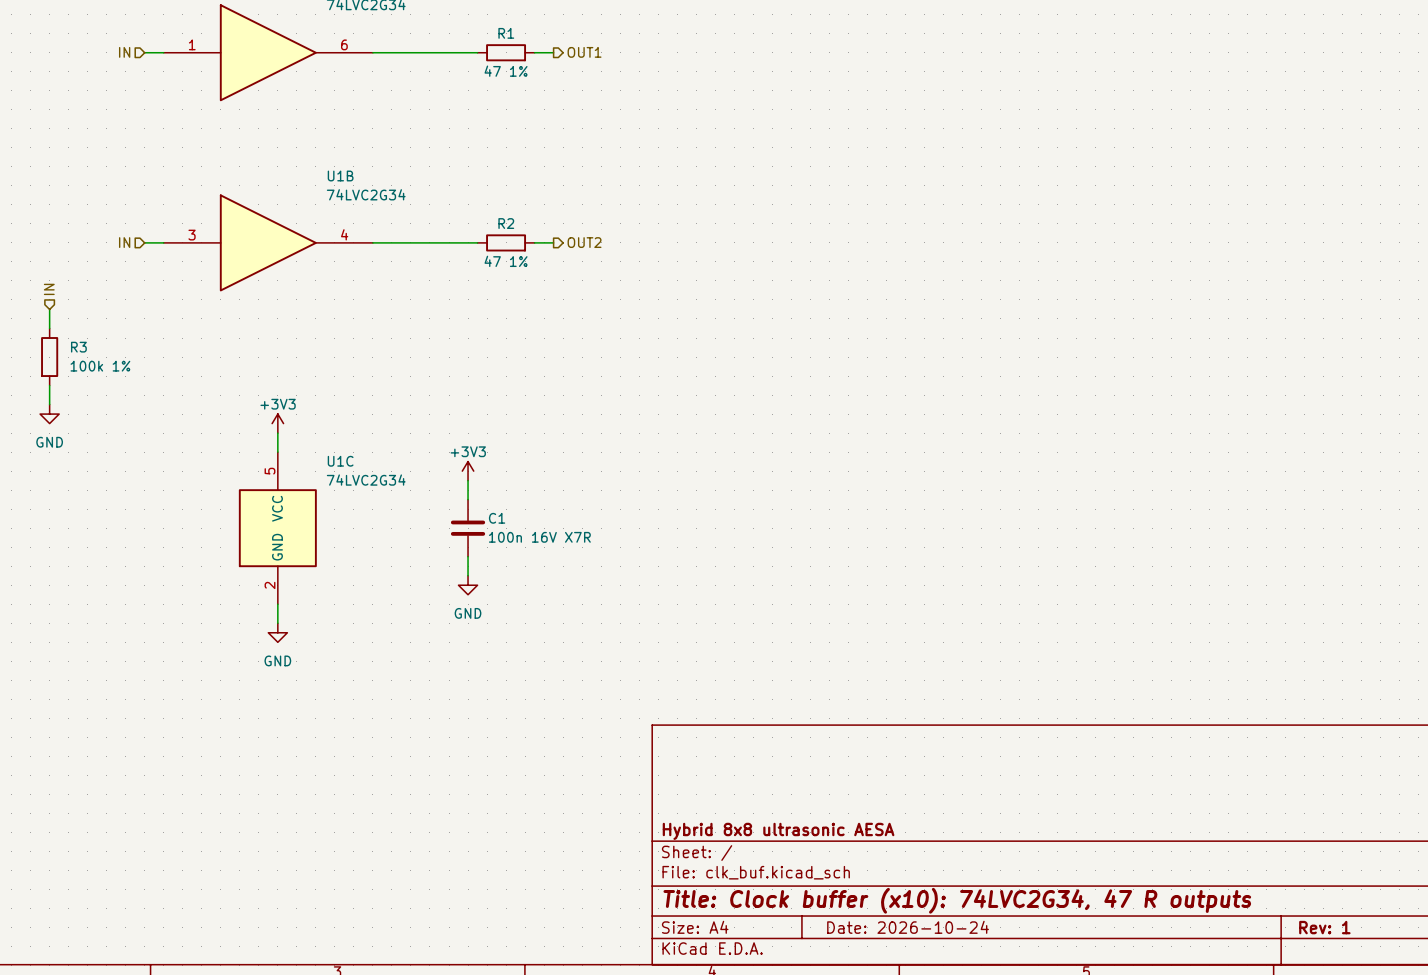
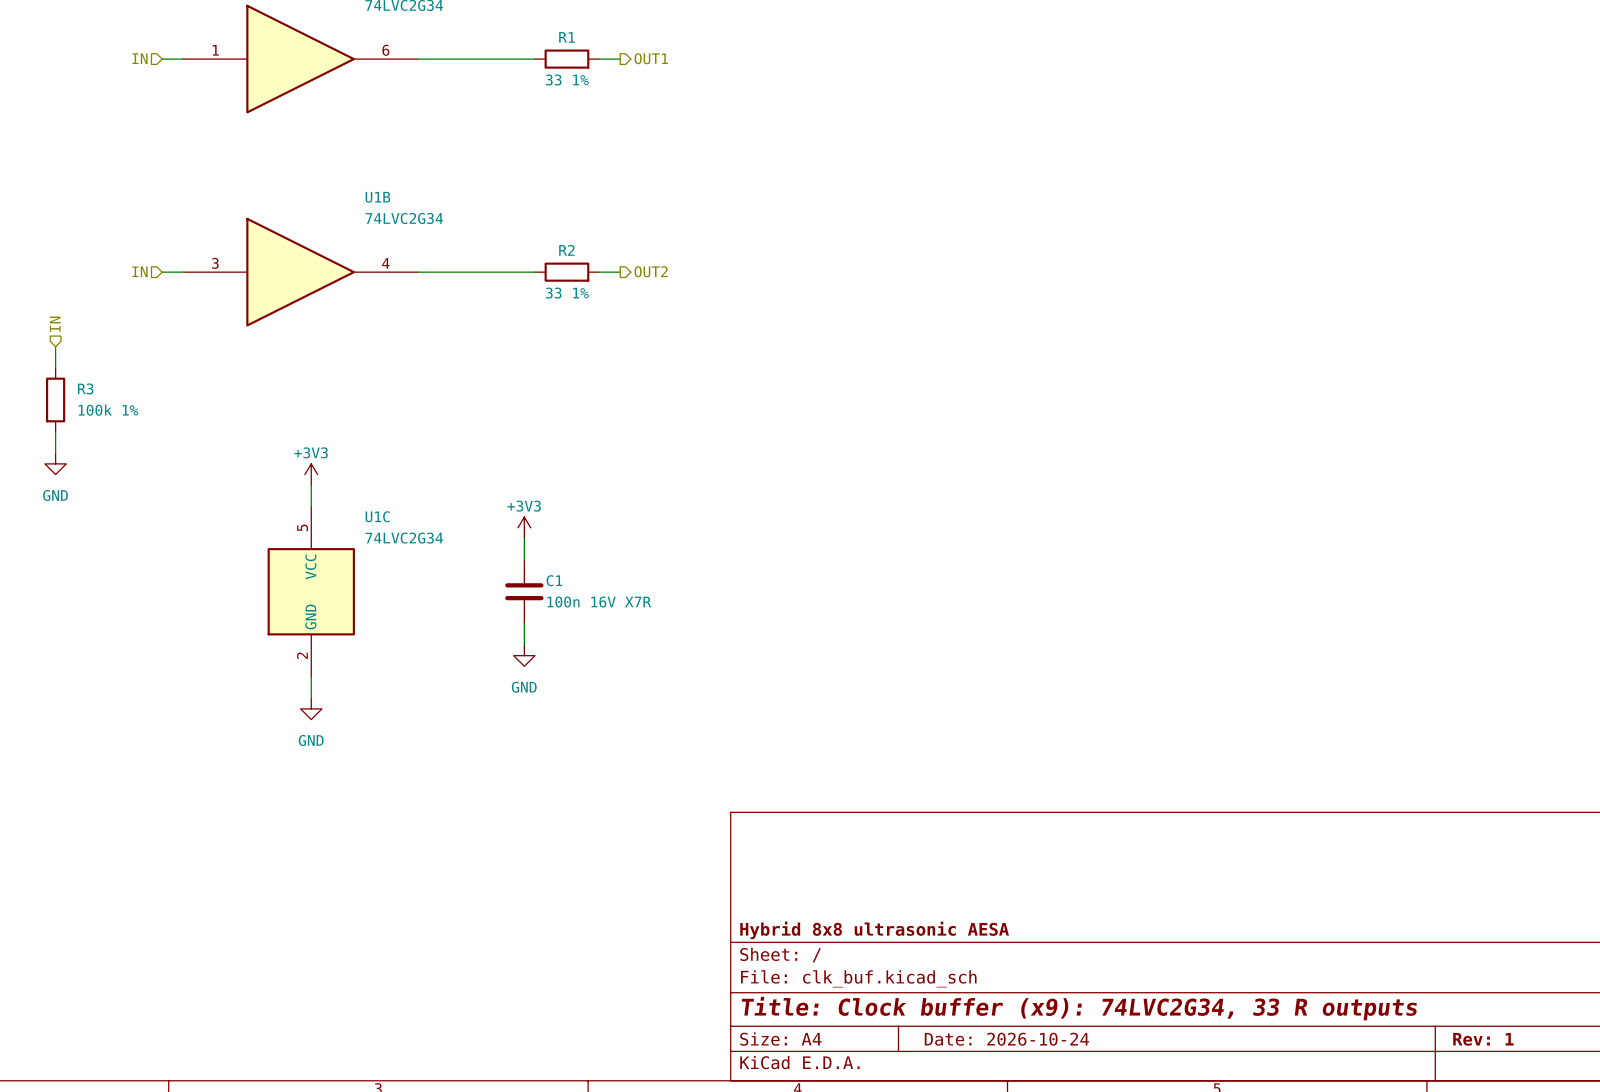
R1 value: 47 1% (506, 71) -> 33 1% (567, 80)
R2 value: 47 1% (506, 261) -> 33 1% (567, 293)
title block: Title: Clock buffer (x10): 74LVC2G34, 47 R outputs (957, 900) -> Title: Clock buffer (x9): 74LVC2G34, 33 R outputs (1079, 1008)

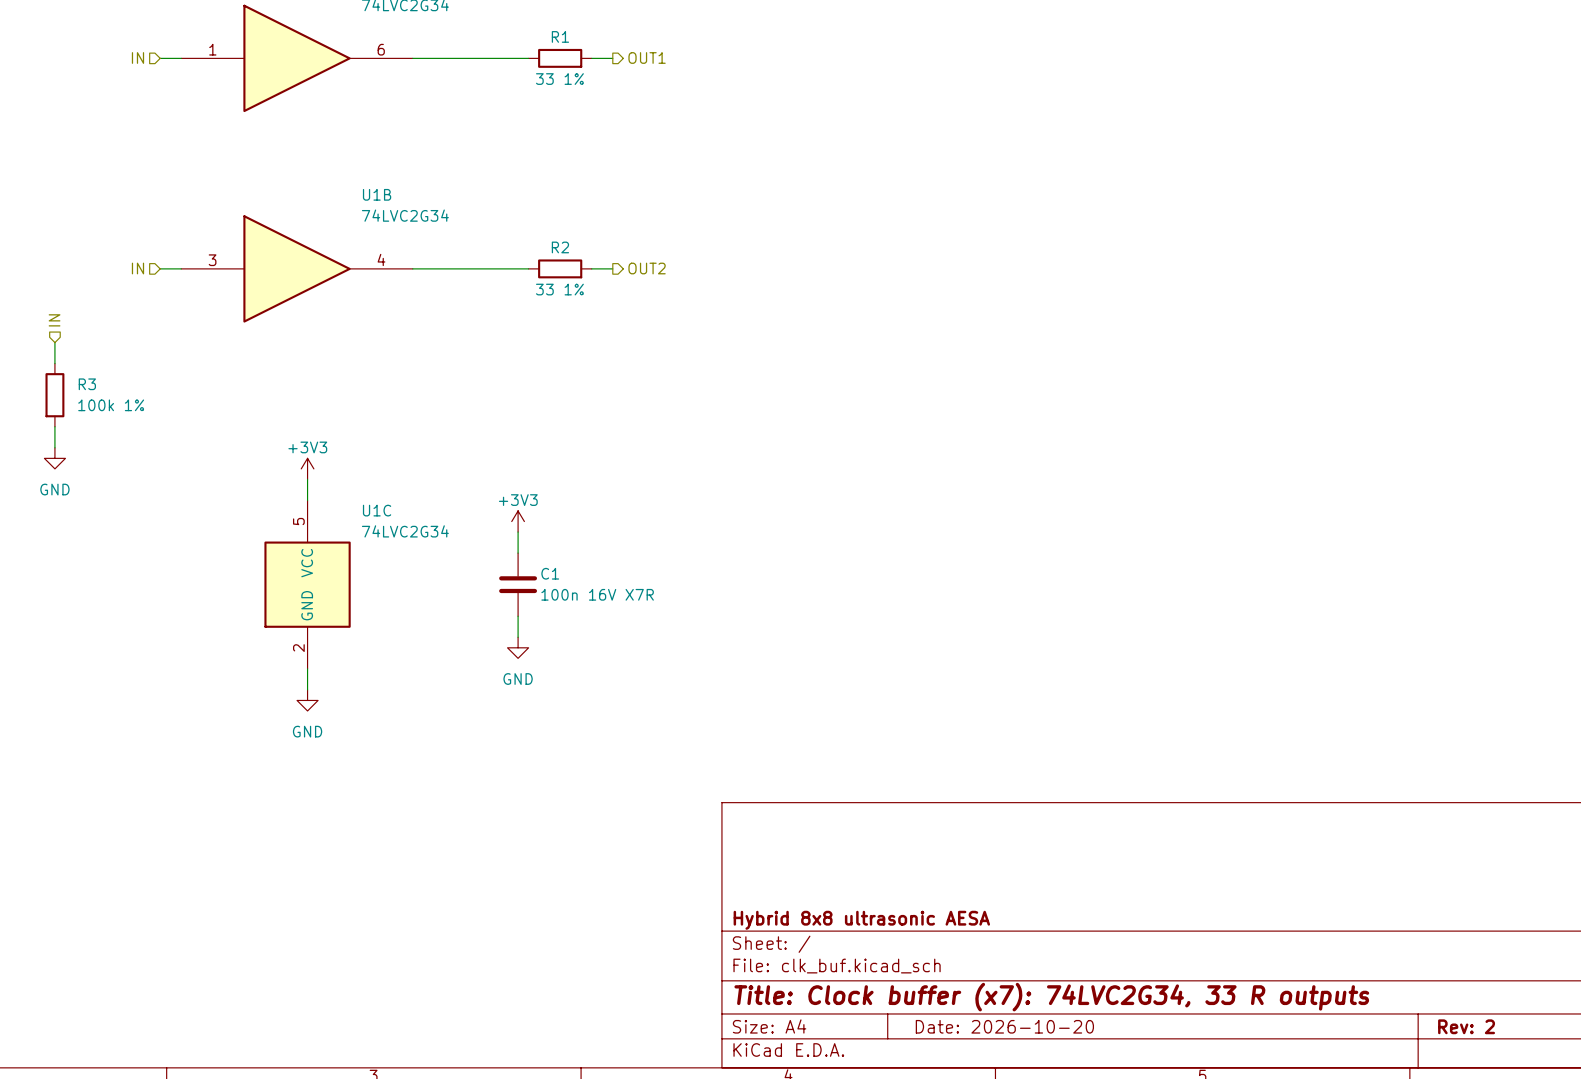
title block: Title: Clock buffer (x9): 74LVC2G34, 33 R outputs (1079, 1008) -> Title: Clock buffer (x7): 74LVC2G34, 33 R outputs (1051, 997)
title block: Date: 2026-10-24 (1006, 1039) -> Date: 2026-10-20 (1004, 1026)
title block: Rev: 1 (1483, 1039) -> Rev: 2 (1466, 1026)

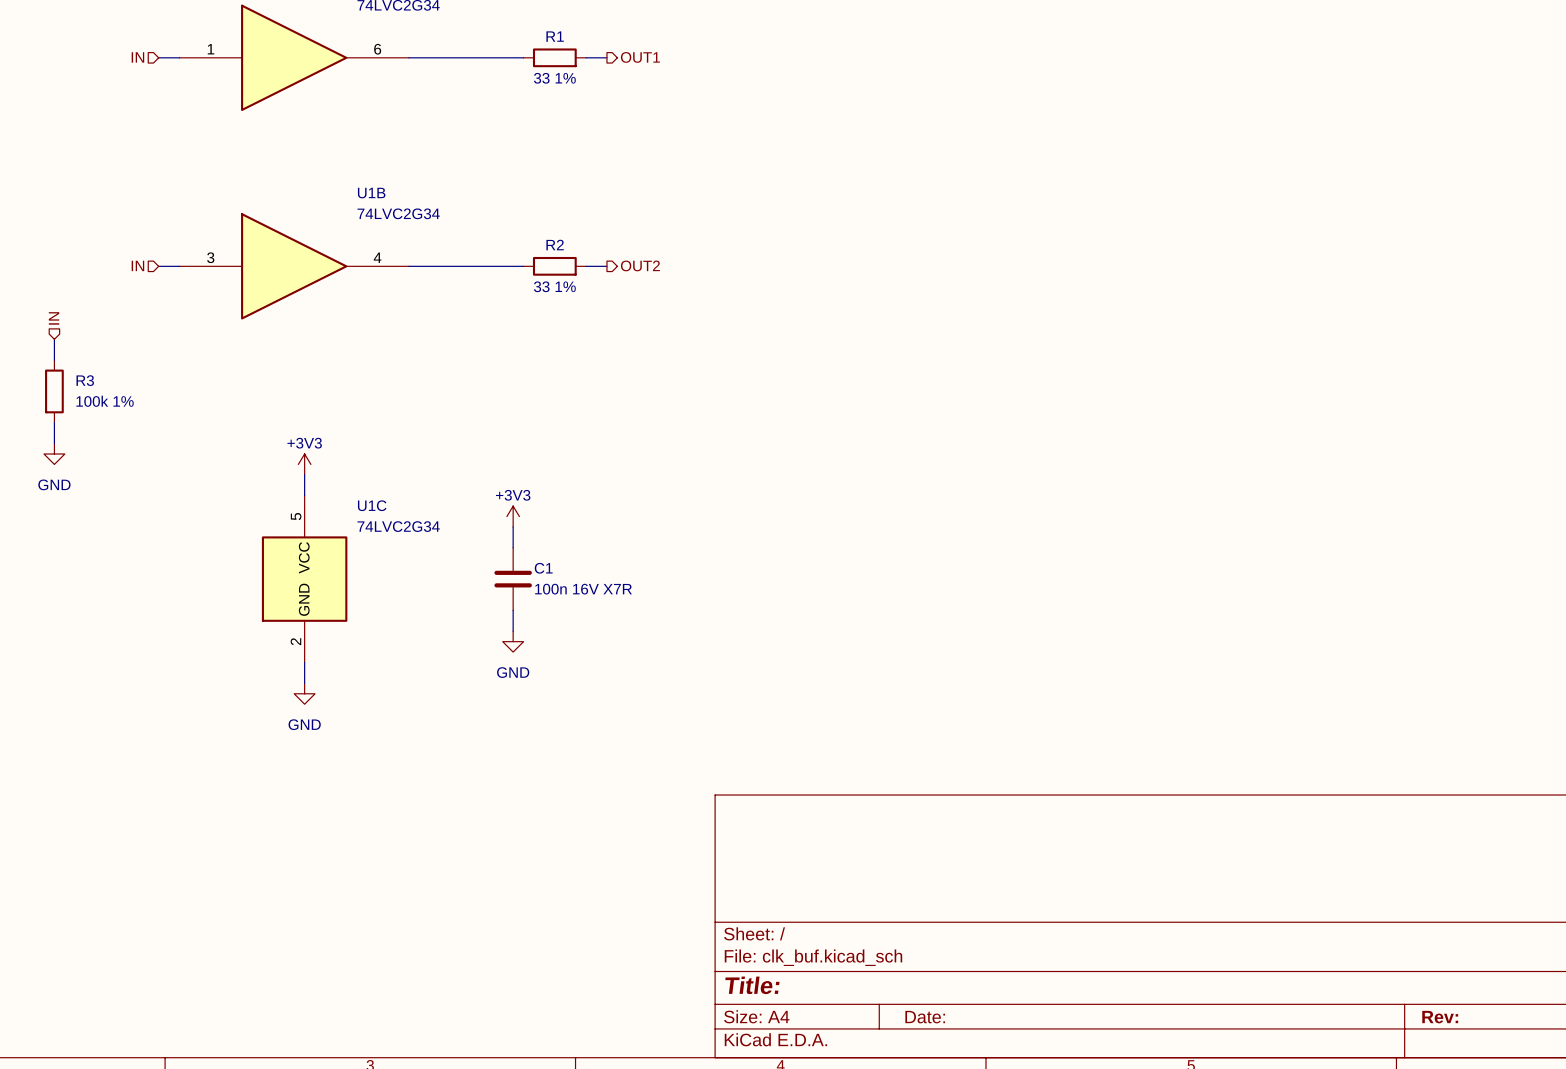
title block: Hybrid 8x8 ultrasonic AESA (861, 920) -> none
title block: Title: Clock buffer (x7): 74LVC2G34, 33 R outputs (1051, 997) -> Title: (752, 985)
title block: Date: 2026-10-20 (1004, 1026) -> Date: (925, 1017)
title block: Rev: 2 (1466, 1026) -> Rev: (1440, 1017)

